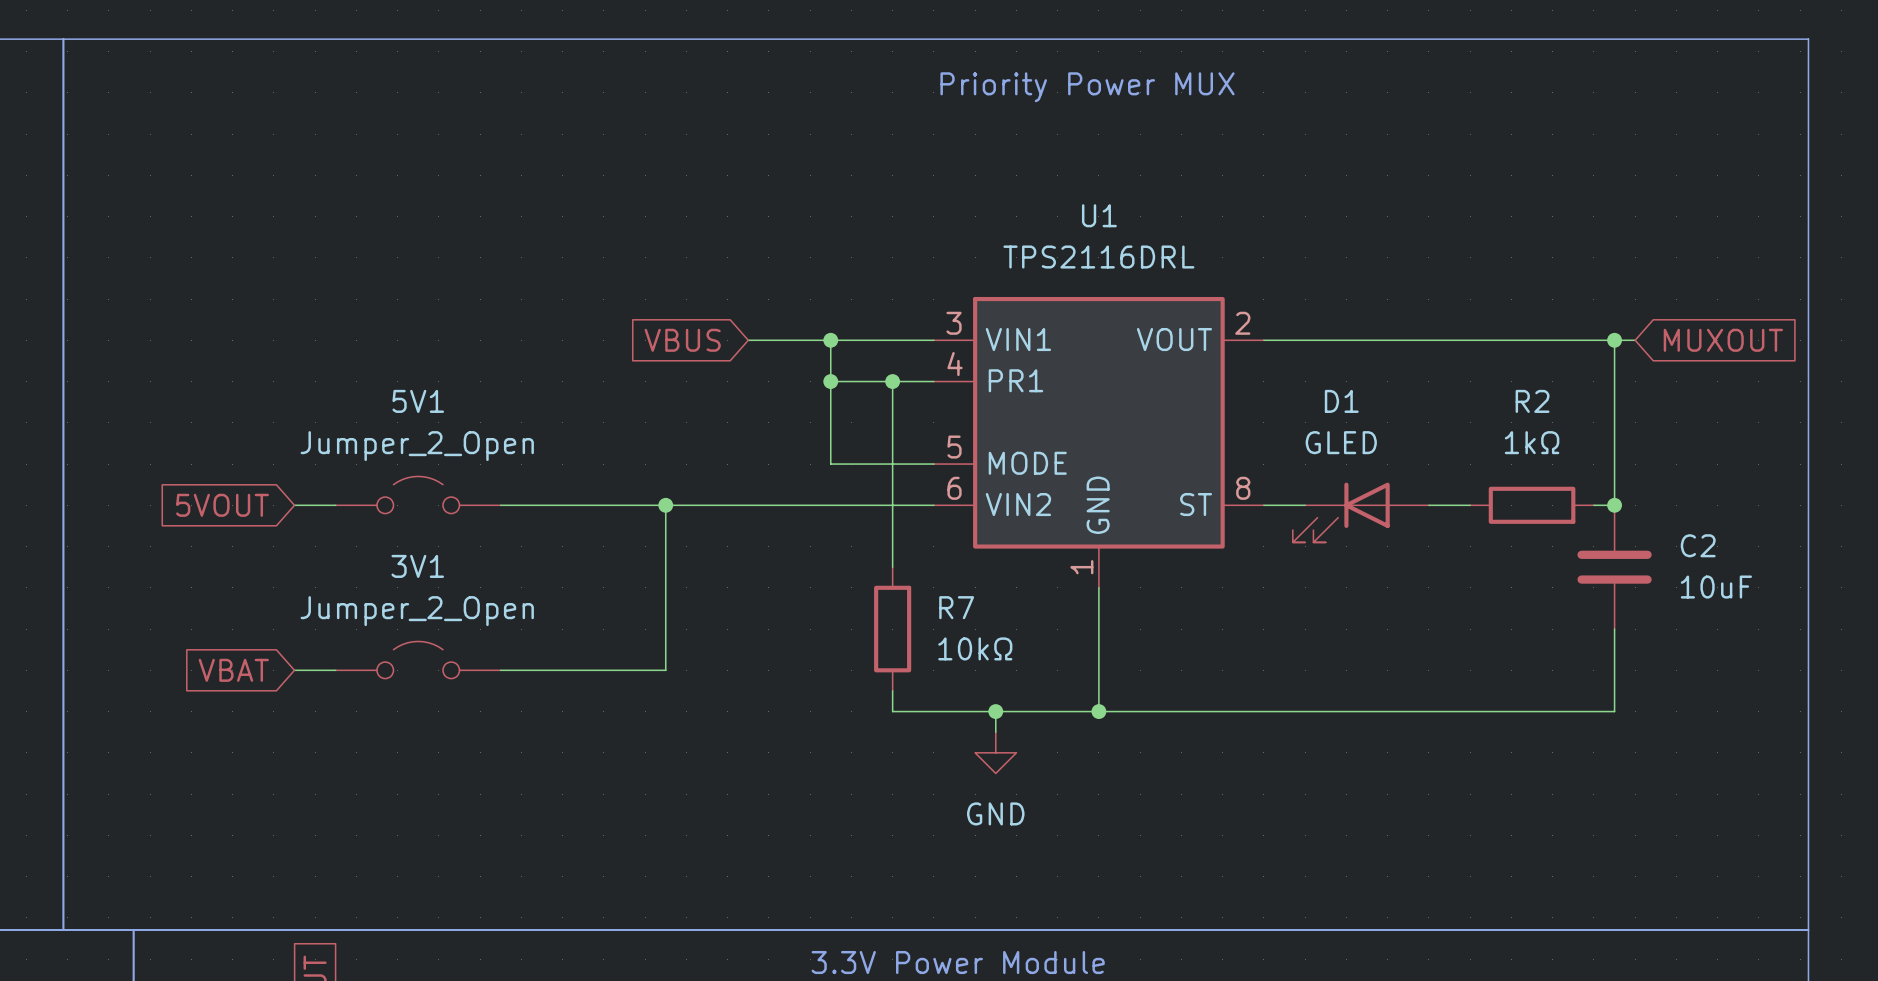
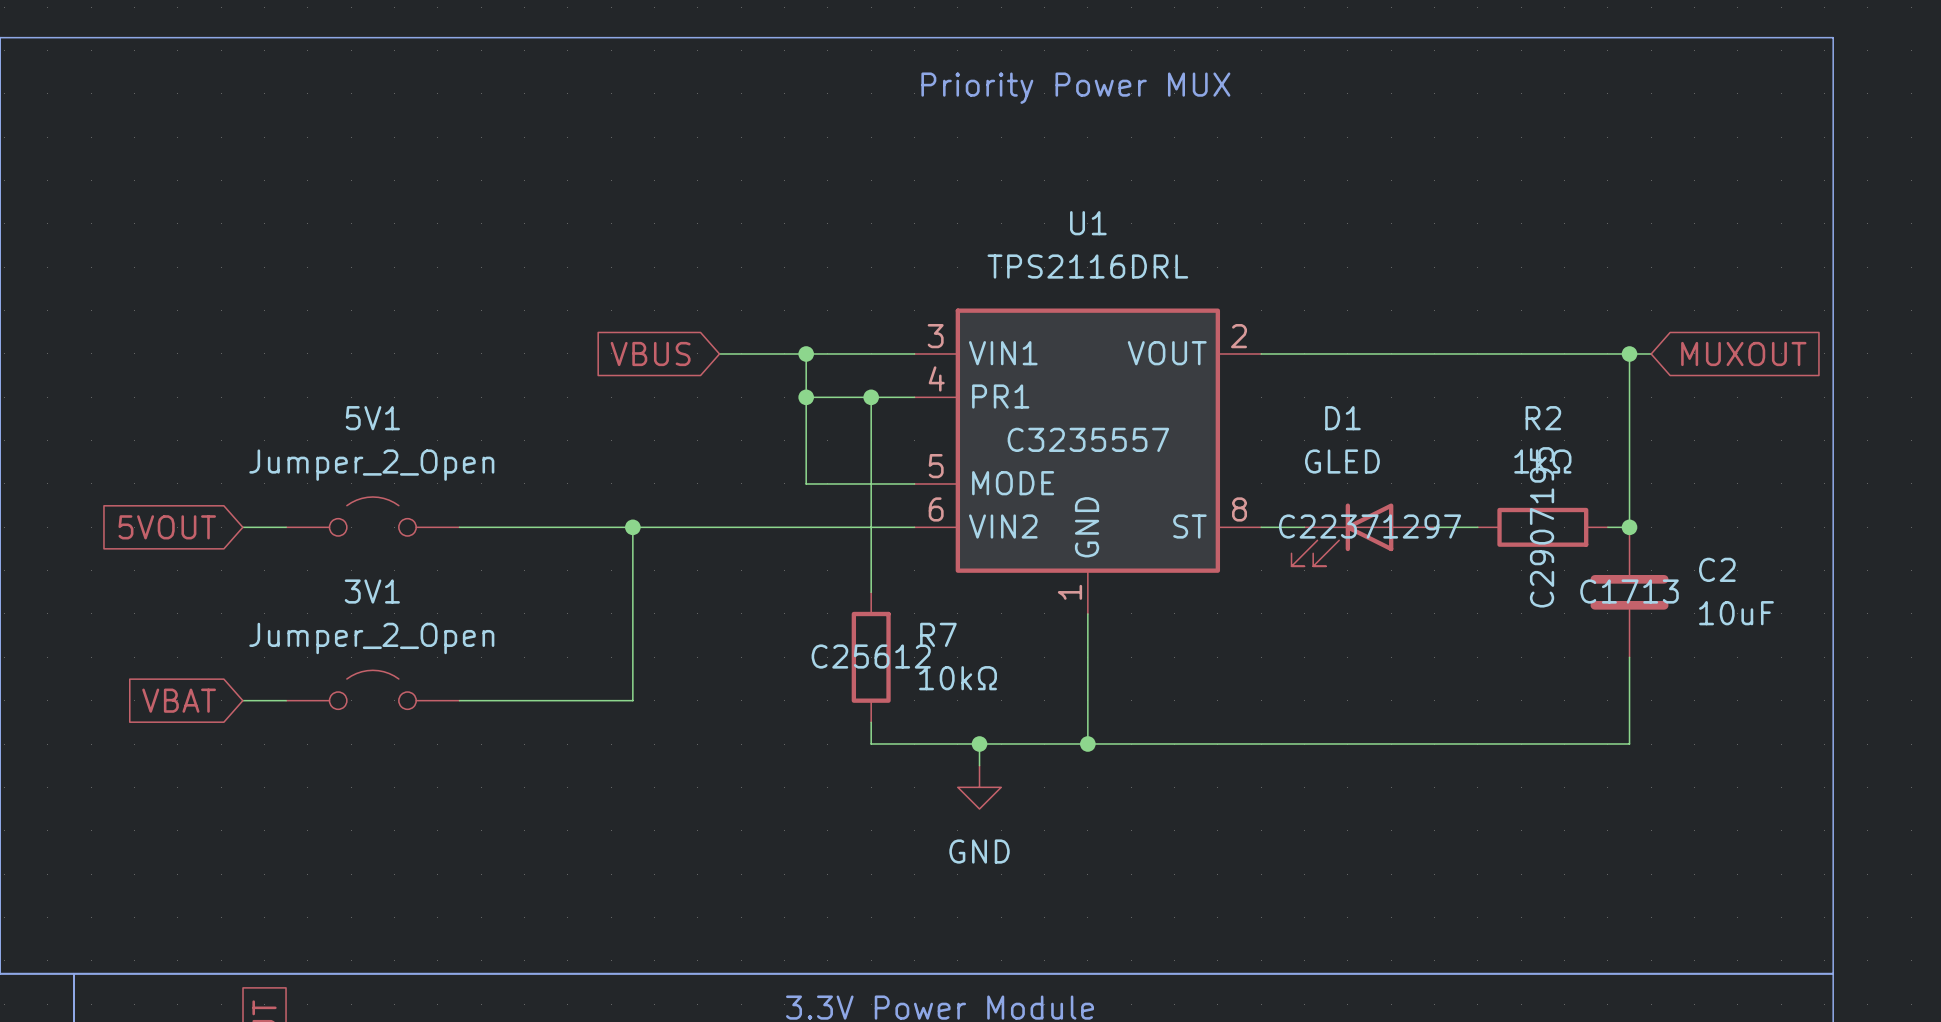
U1 text: none -> C3235557 (1088, 439)
D1 text: none -> C22371297 (1370, 526)
R2 text: none -> C2907195 (1542, 527)
C2 text: none -> C1713 (1629, 591)
R7 text: none -> C25612 (871, 656)

